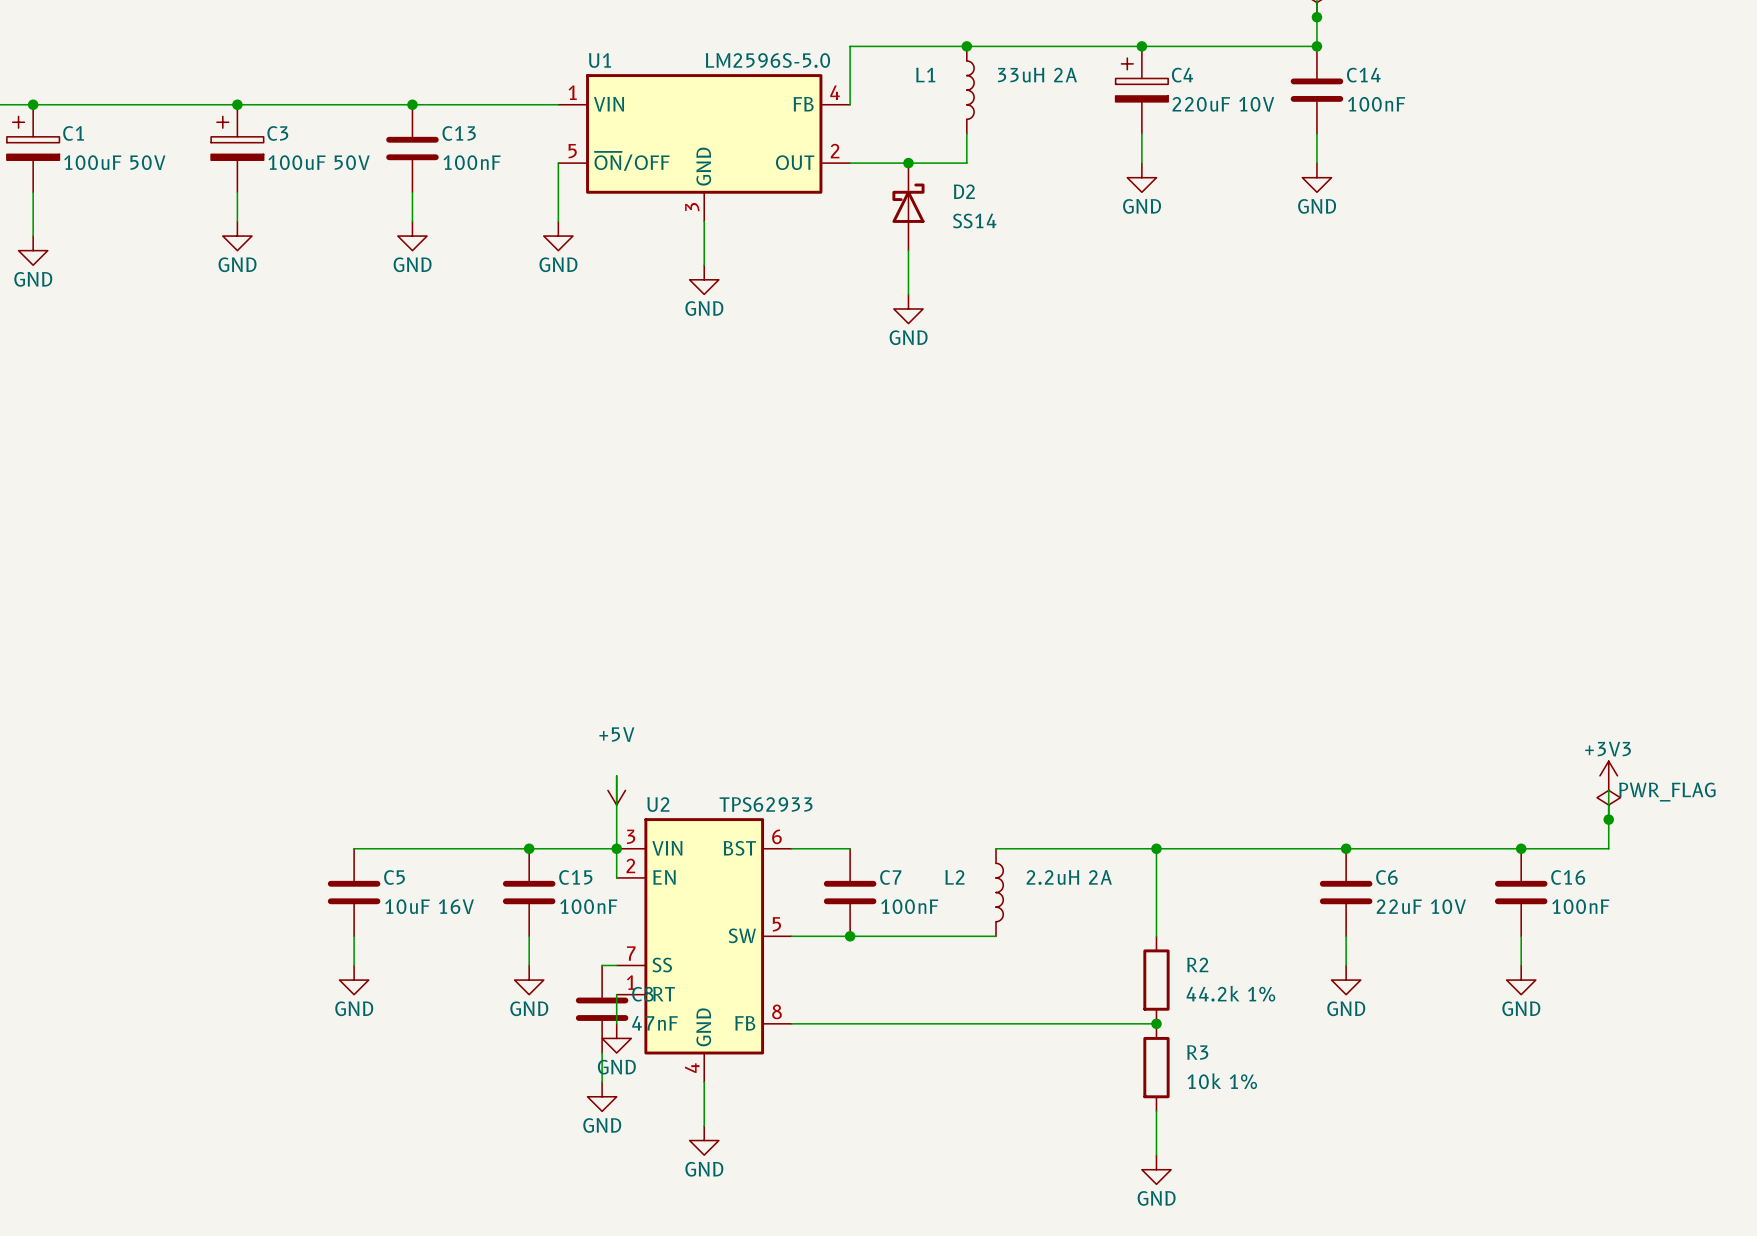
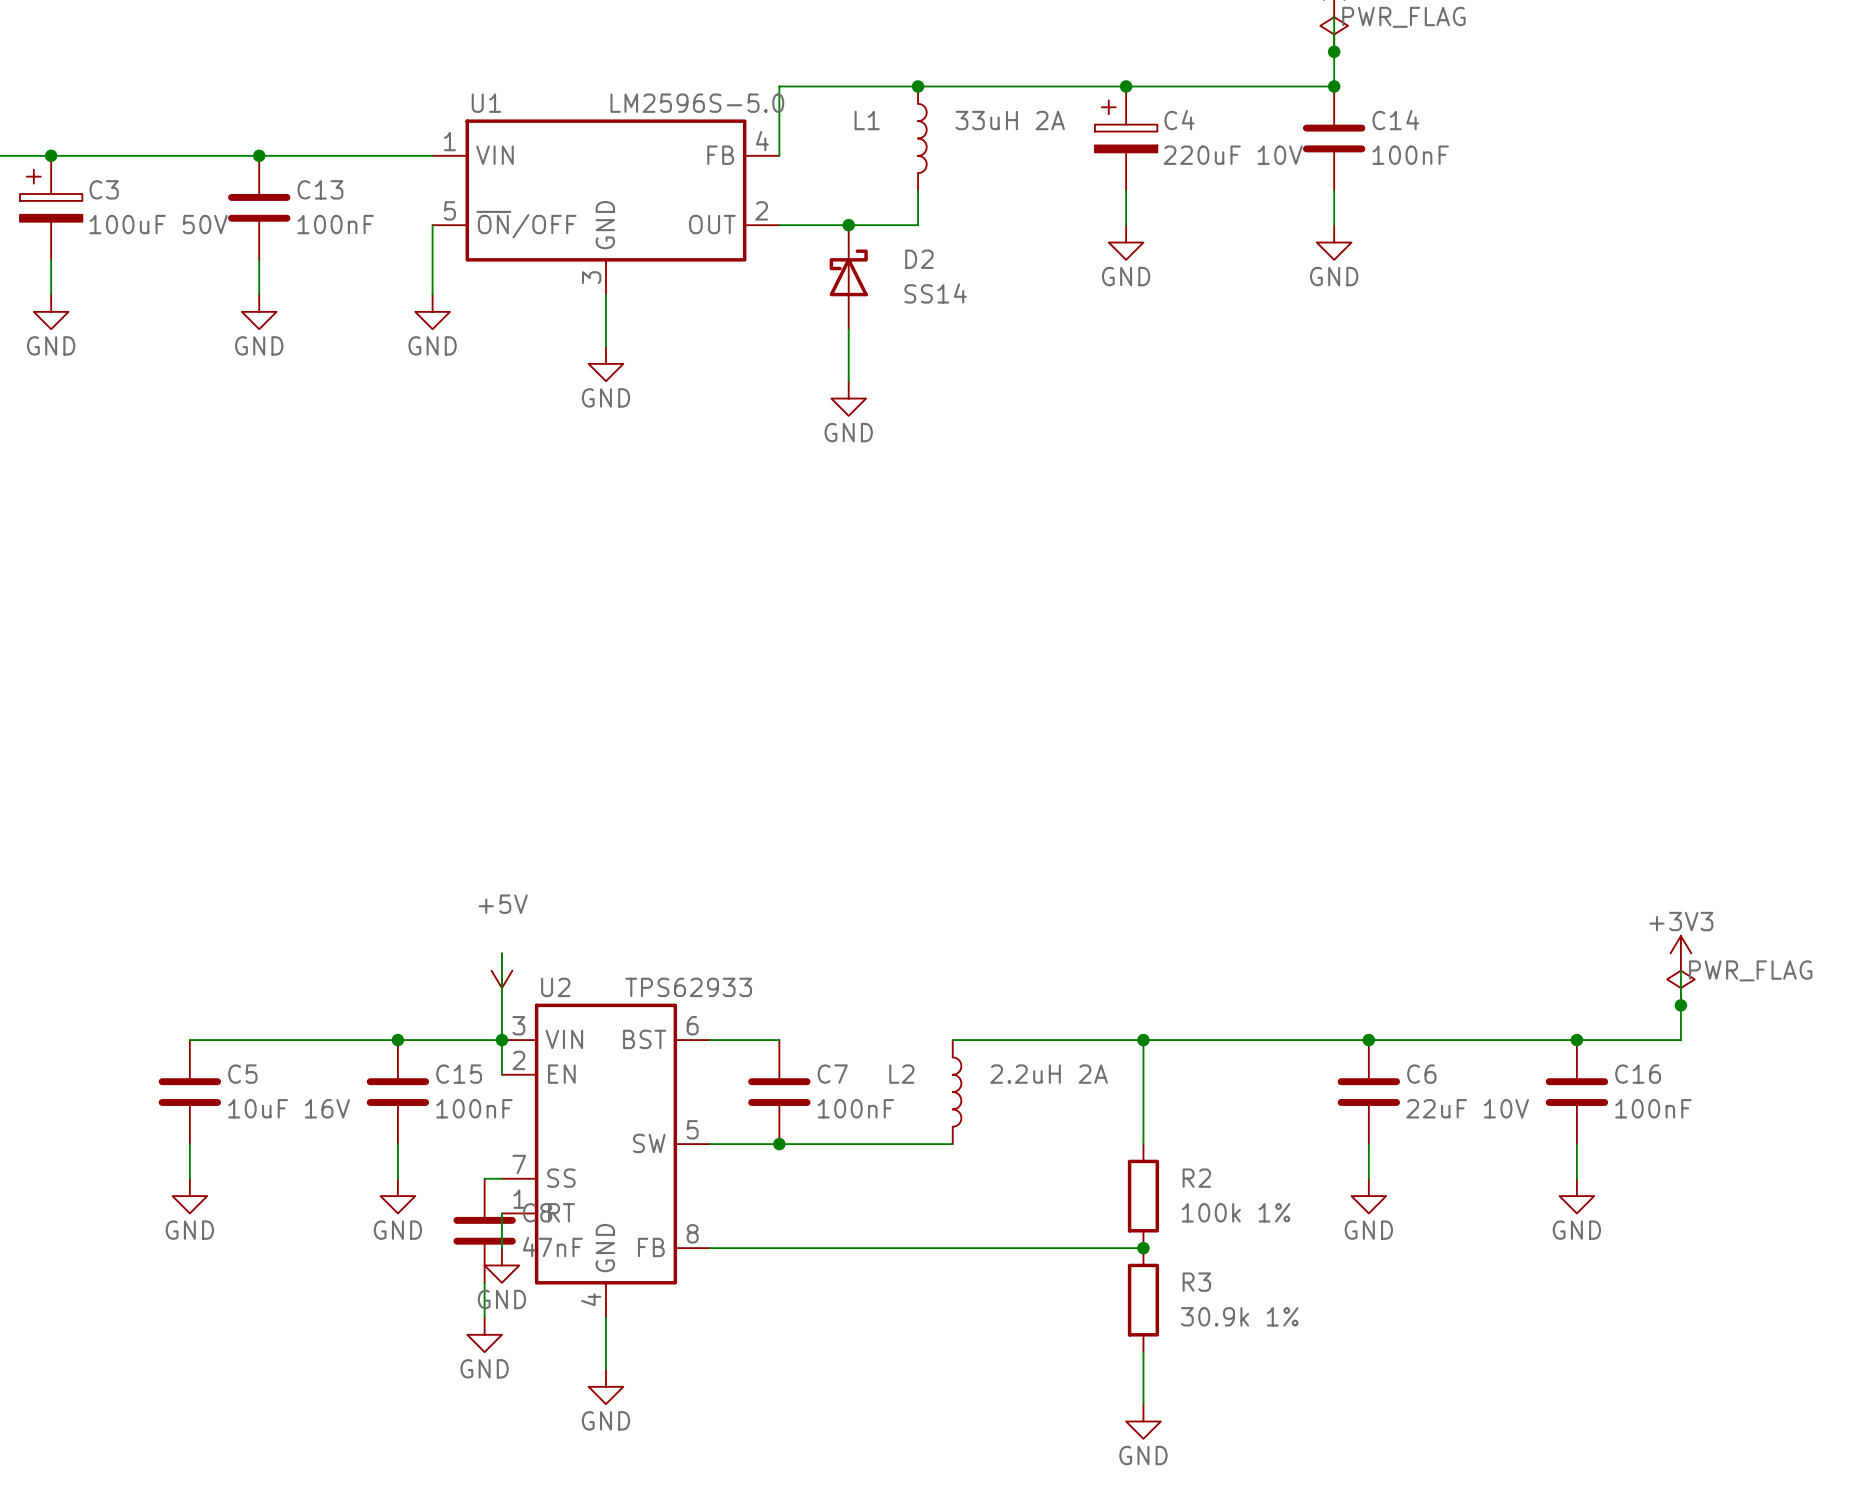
R2 value: 44.2k 1% (1230, 993) -> 100k 1% (1236, 1212)
R3 value: 10k 1% (1222, 1081) -> 30.9k 1% (1239, 1316)

